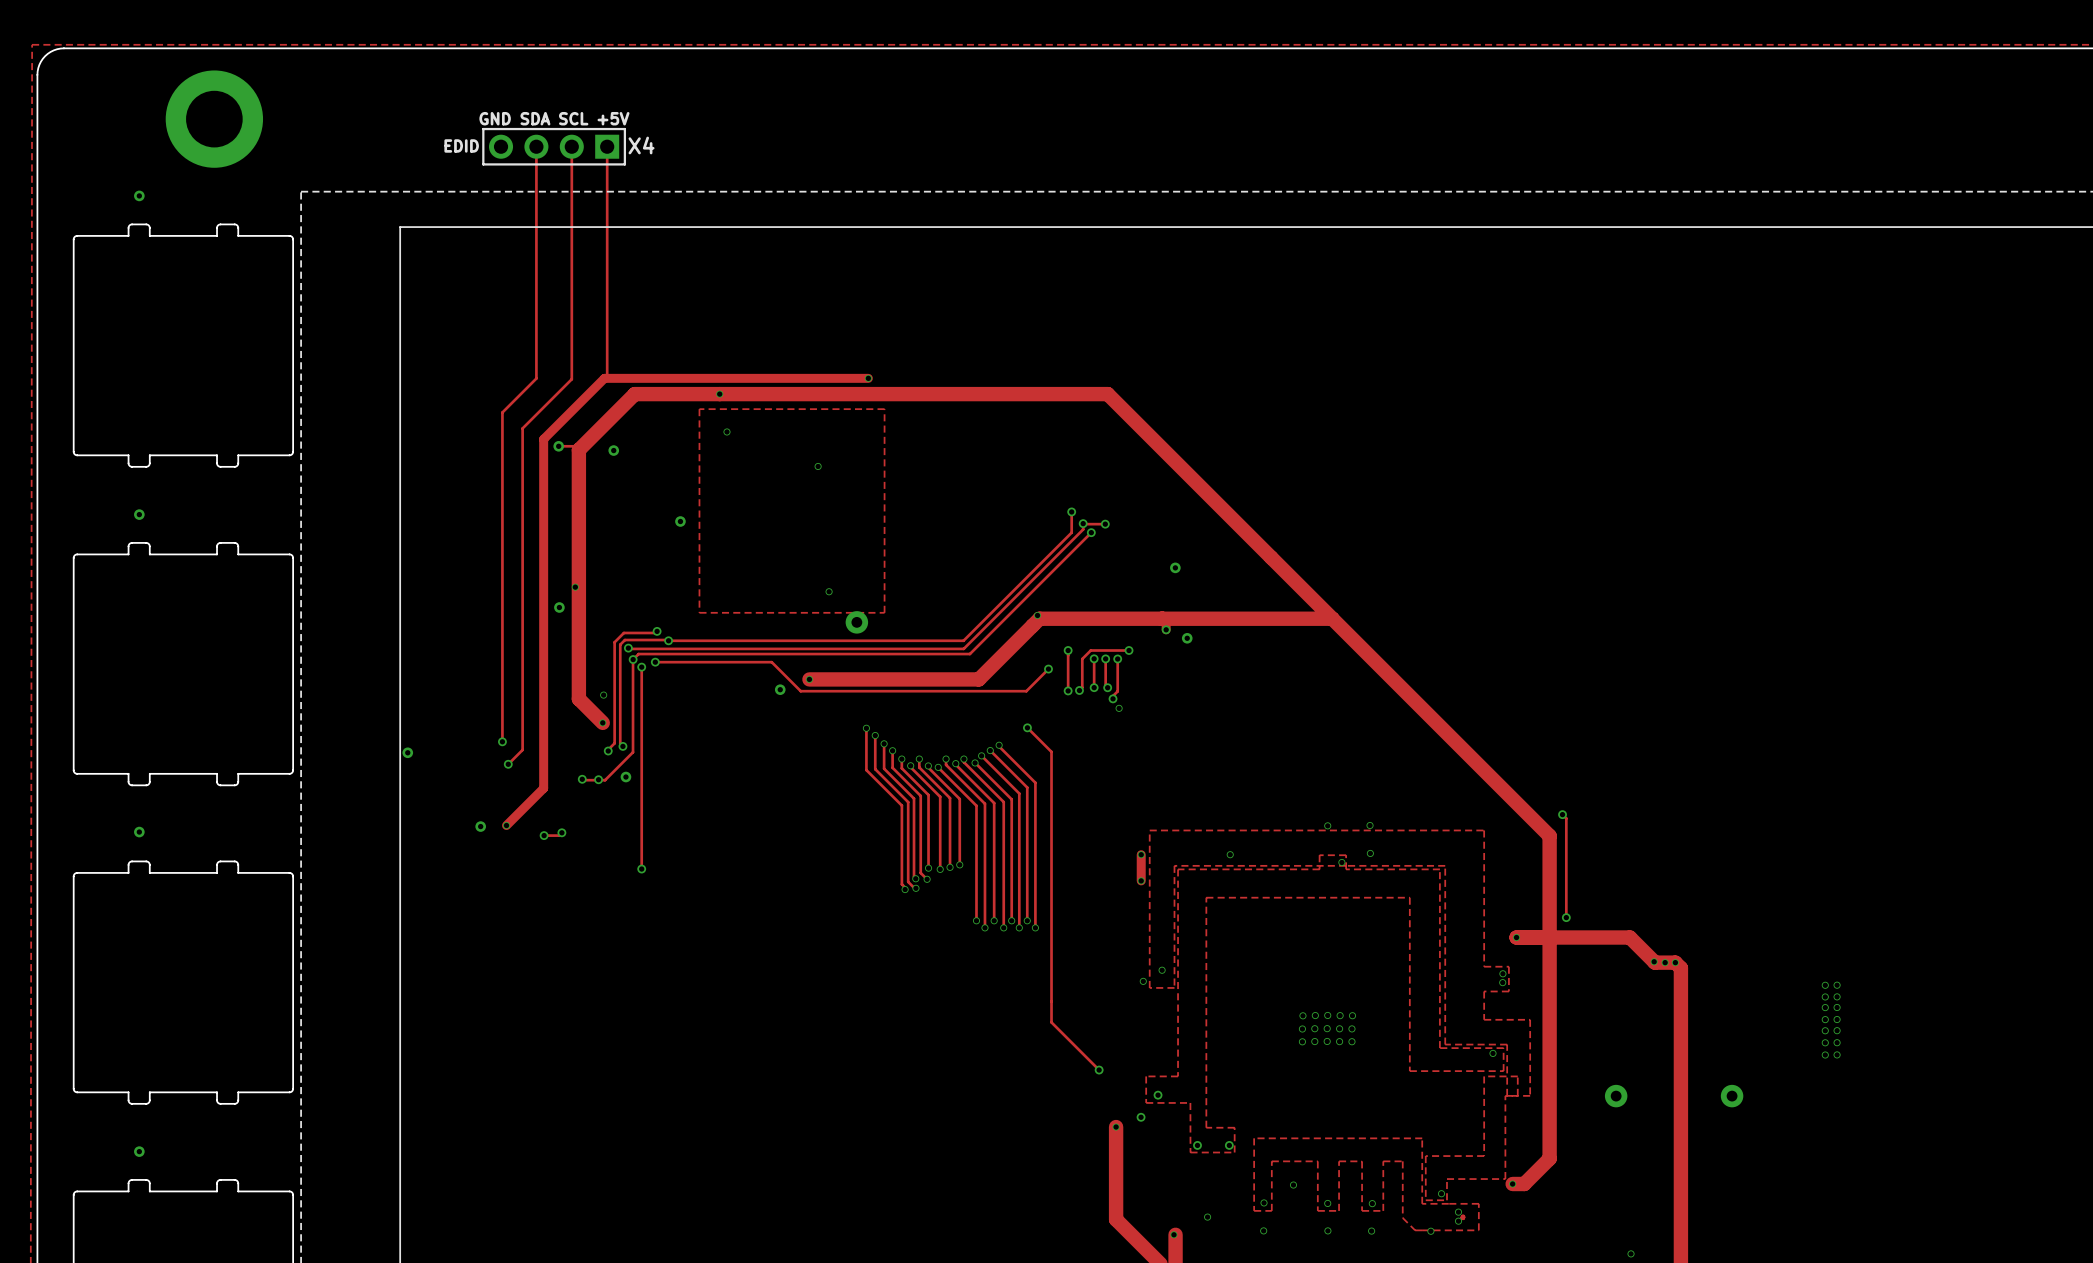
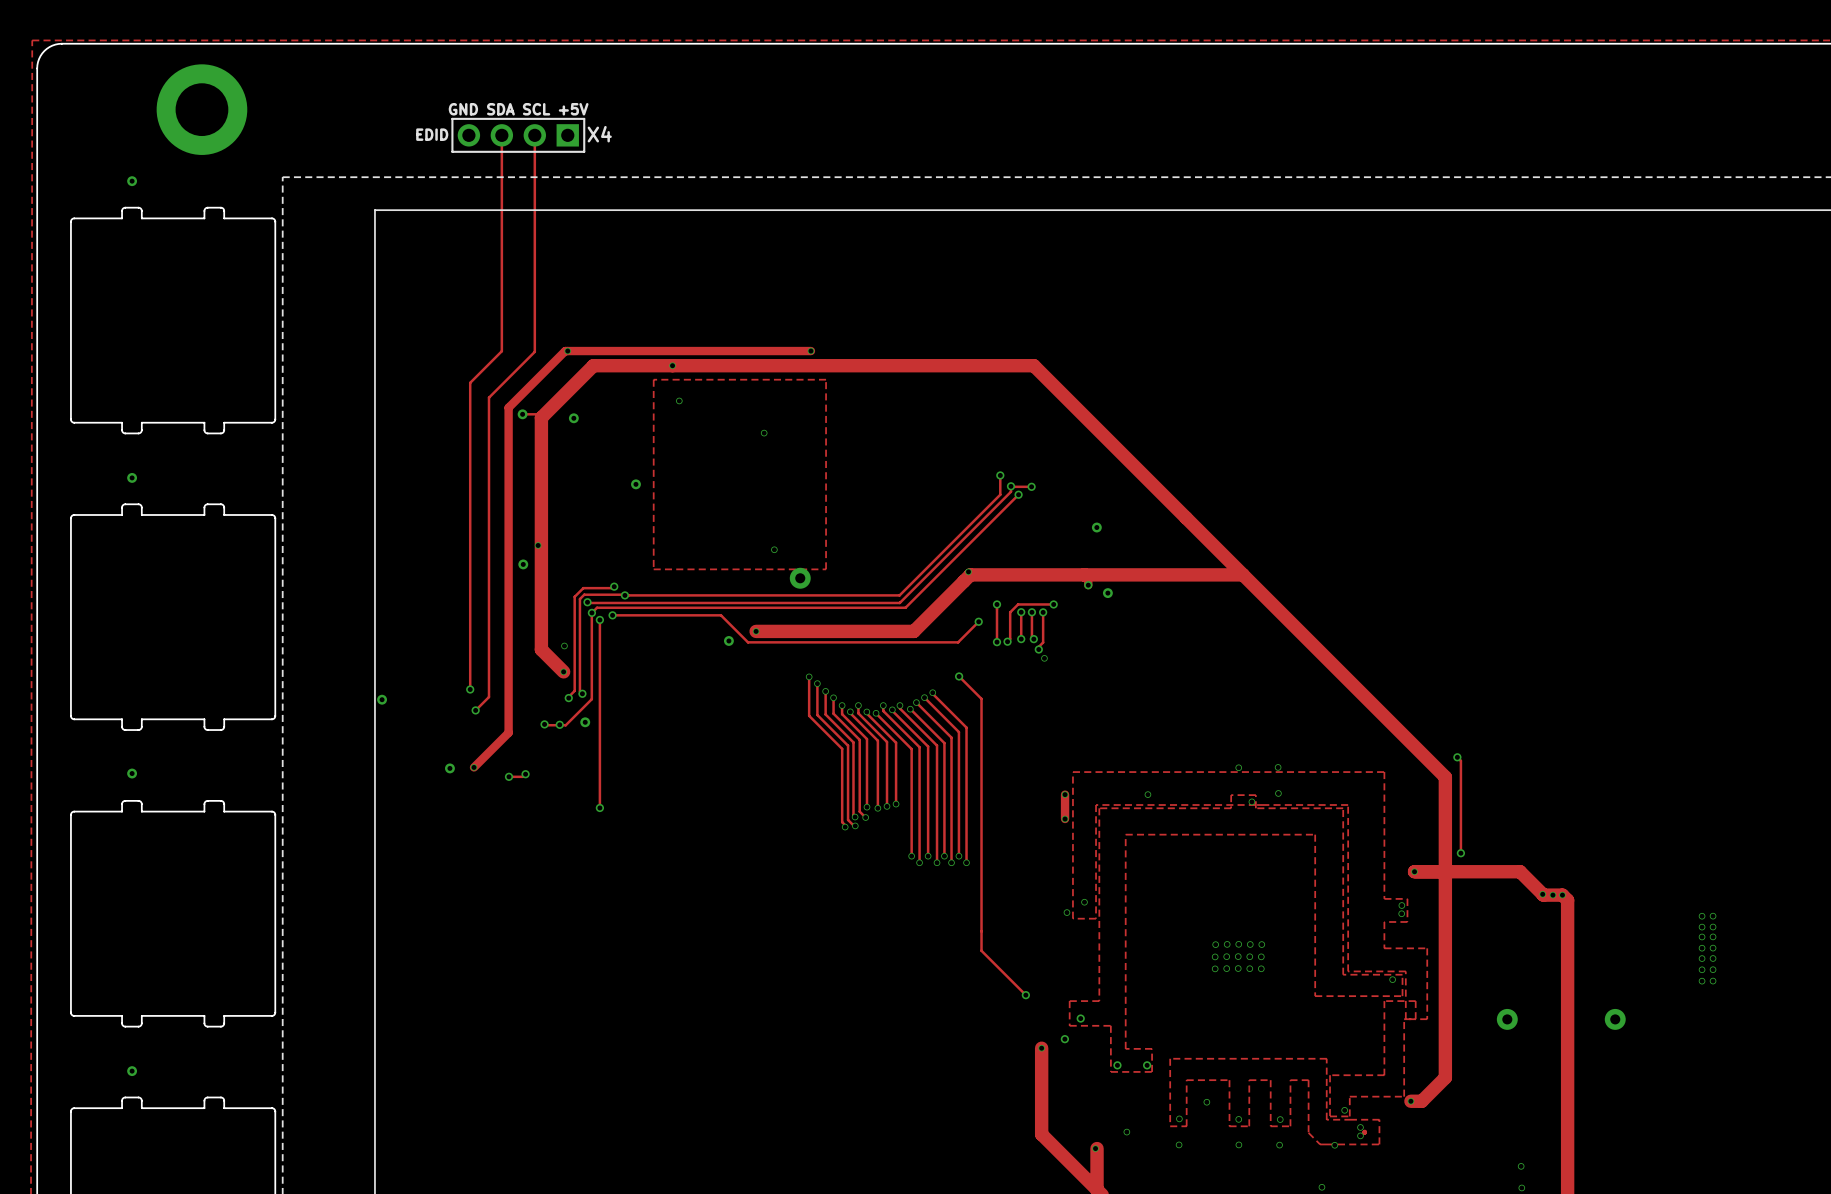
track: (607, 146) (607, 378) -> none
via: none -> (567, 351)

